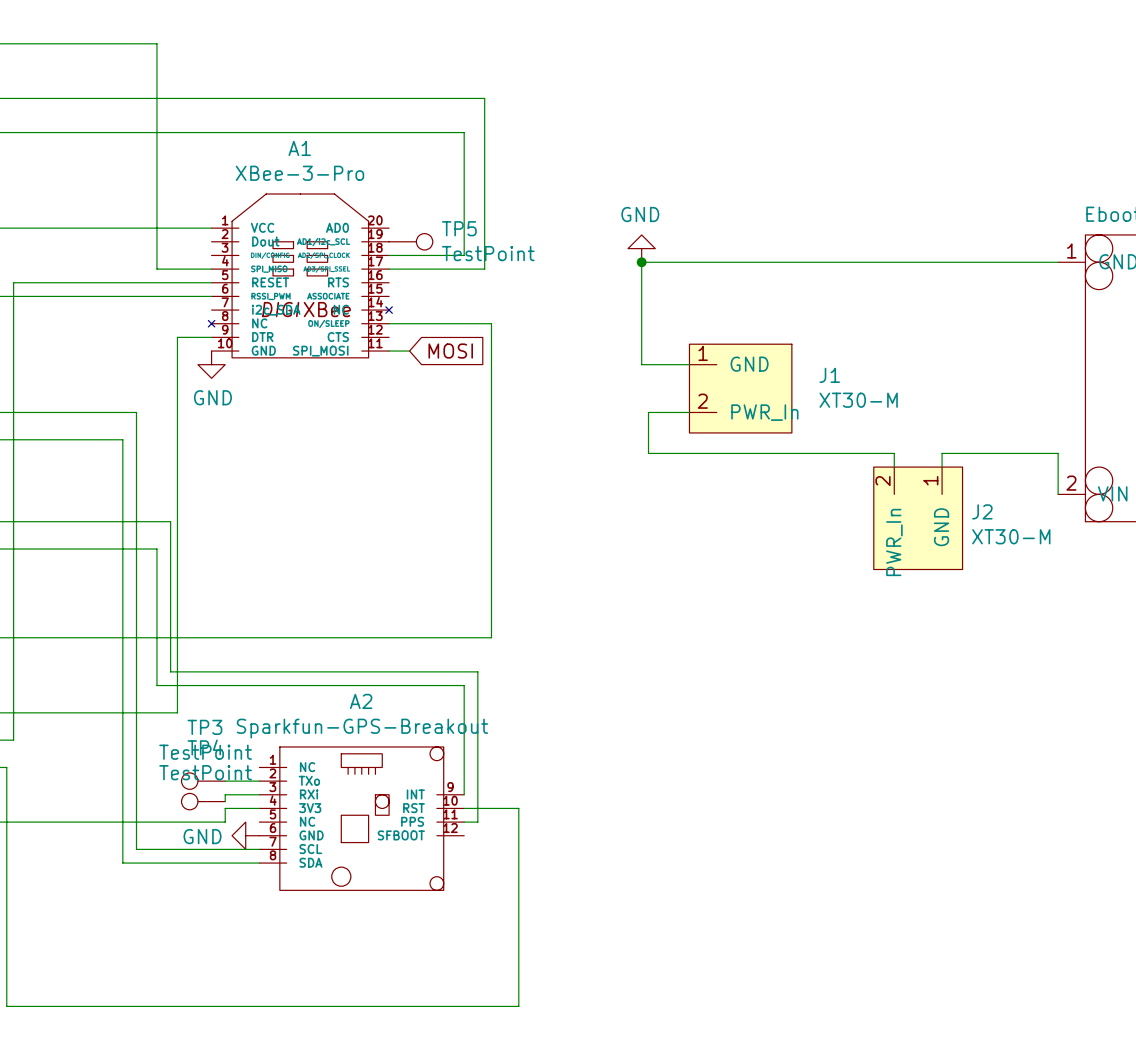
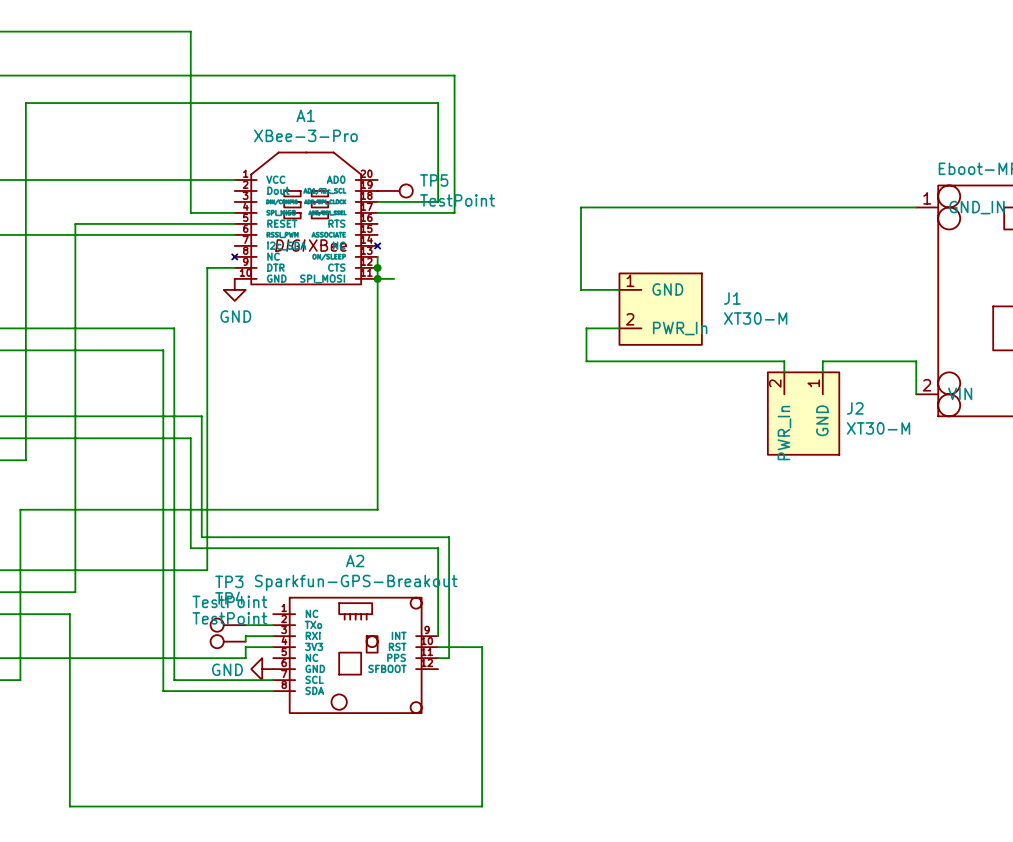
power symbol: GND (641, 248) -> none
junction: (641, 262) -> none
wire: (389, 323) (491, 323) (491, 637) (389, 637) -> (377, 256) (377, 509)
junction: none -> (377, 267)
junction: none -> (377, 278)
global label: MOSI (450, 351) -> none

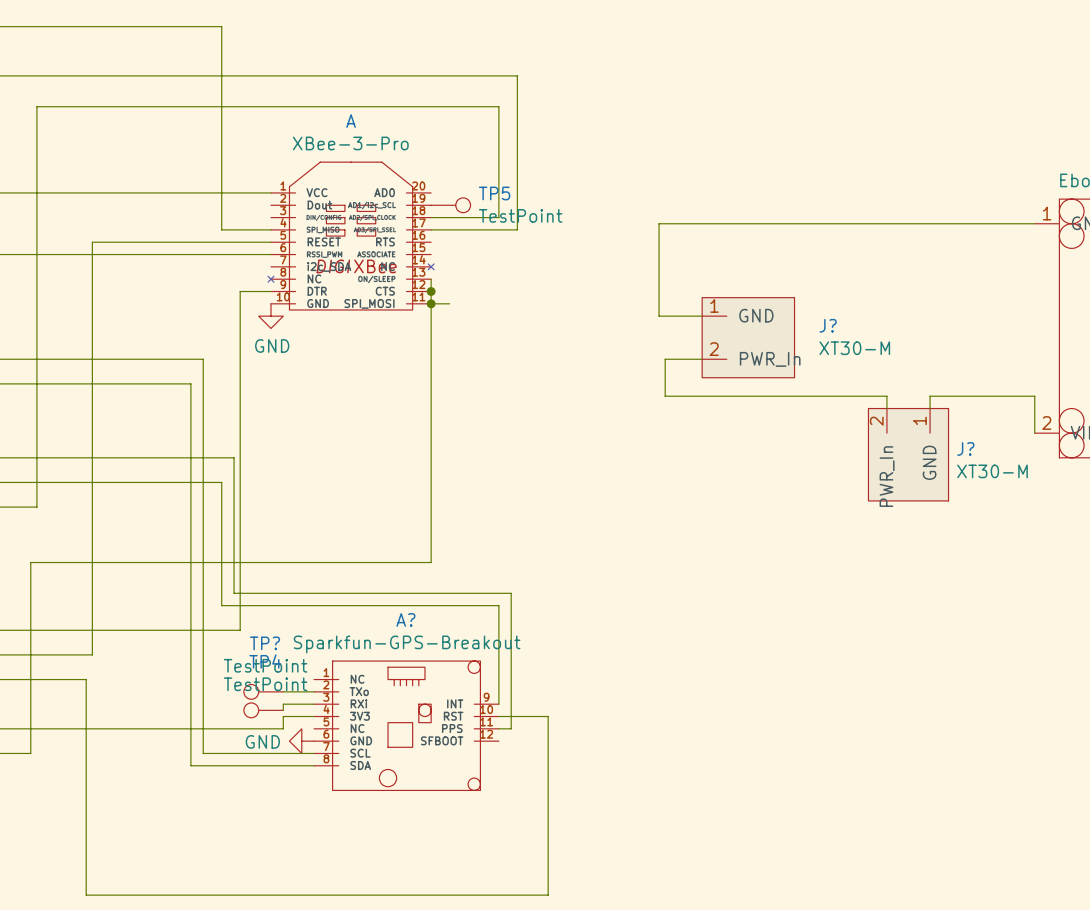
A1 name: A1 (305, 115) -> A (351, 121)
J1 name: J1 (732, 298) -> J? (828, 325)
J2 name: J2 (855, 408) -> J? (965, 448)
A2 name: A2 (355, 560) -> A? (405, 619)
TP3 name: TP3 (229, 581) -> TP? (264, 643)

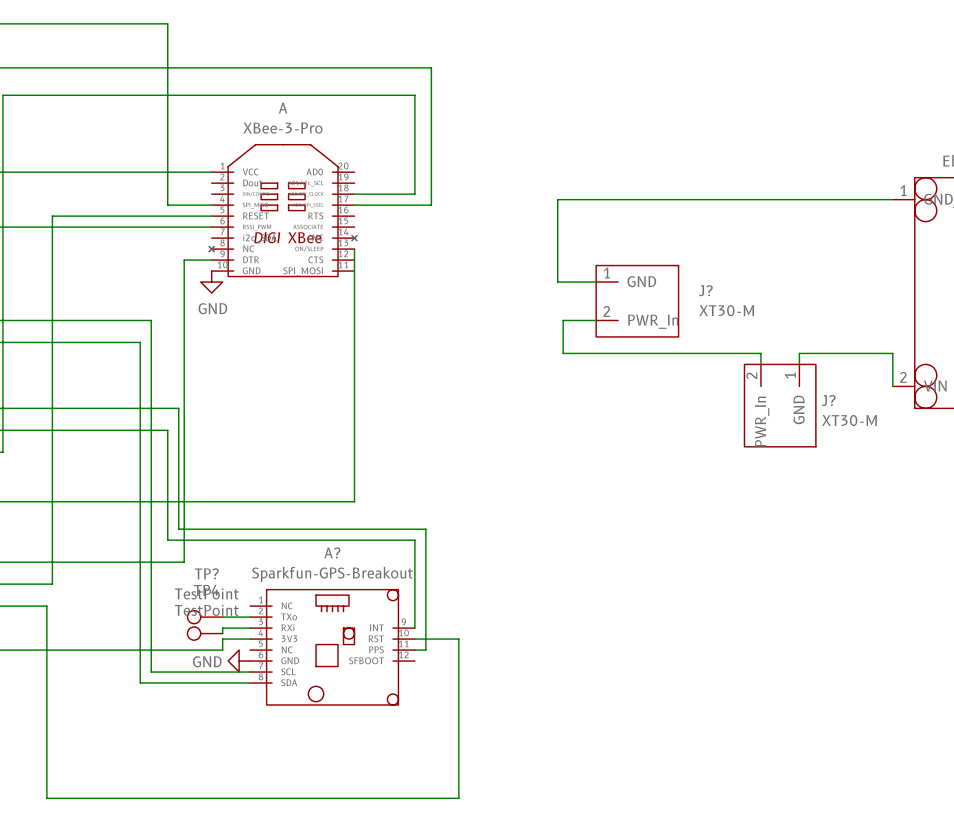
TP5: TestPoint (450, 205) -> none
junction: (431, 291) -> none
wire: (431, 303) (449, 303) -> none
junction: (431, 303) -> none

